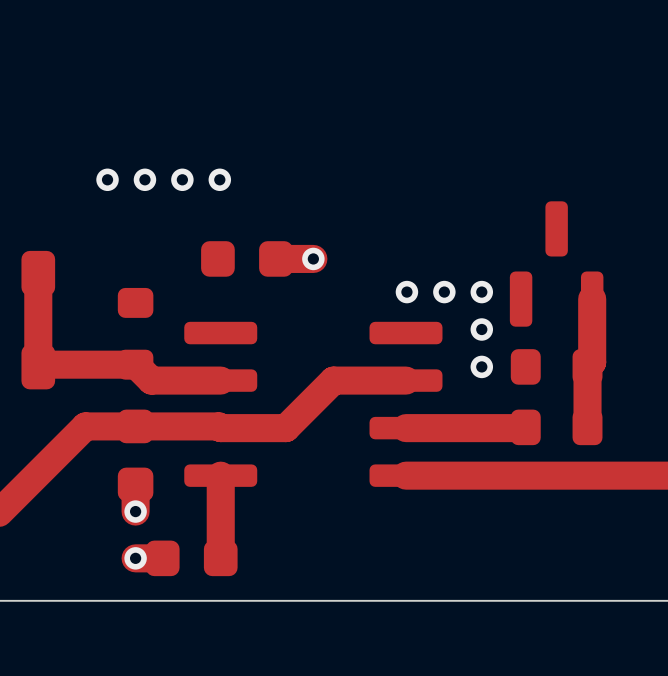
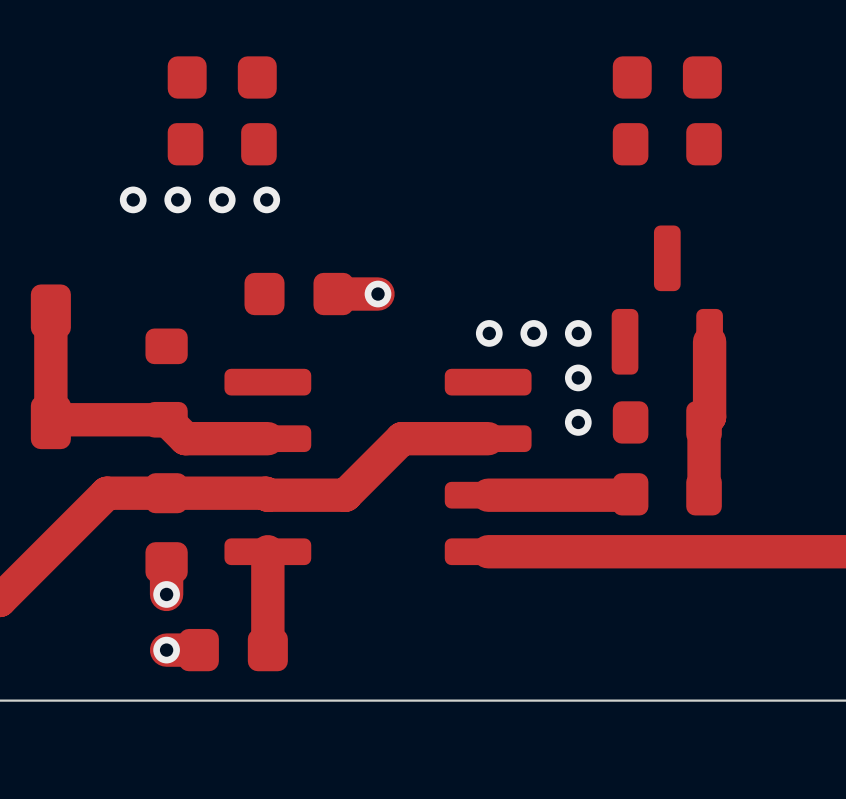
part: none -> (222, 77)
part: none -> (667, 77)
part: none -> (222, 144)
part: none -> (667, 144)

